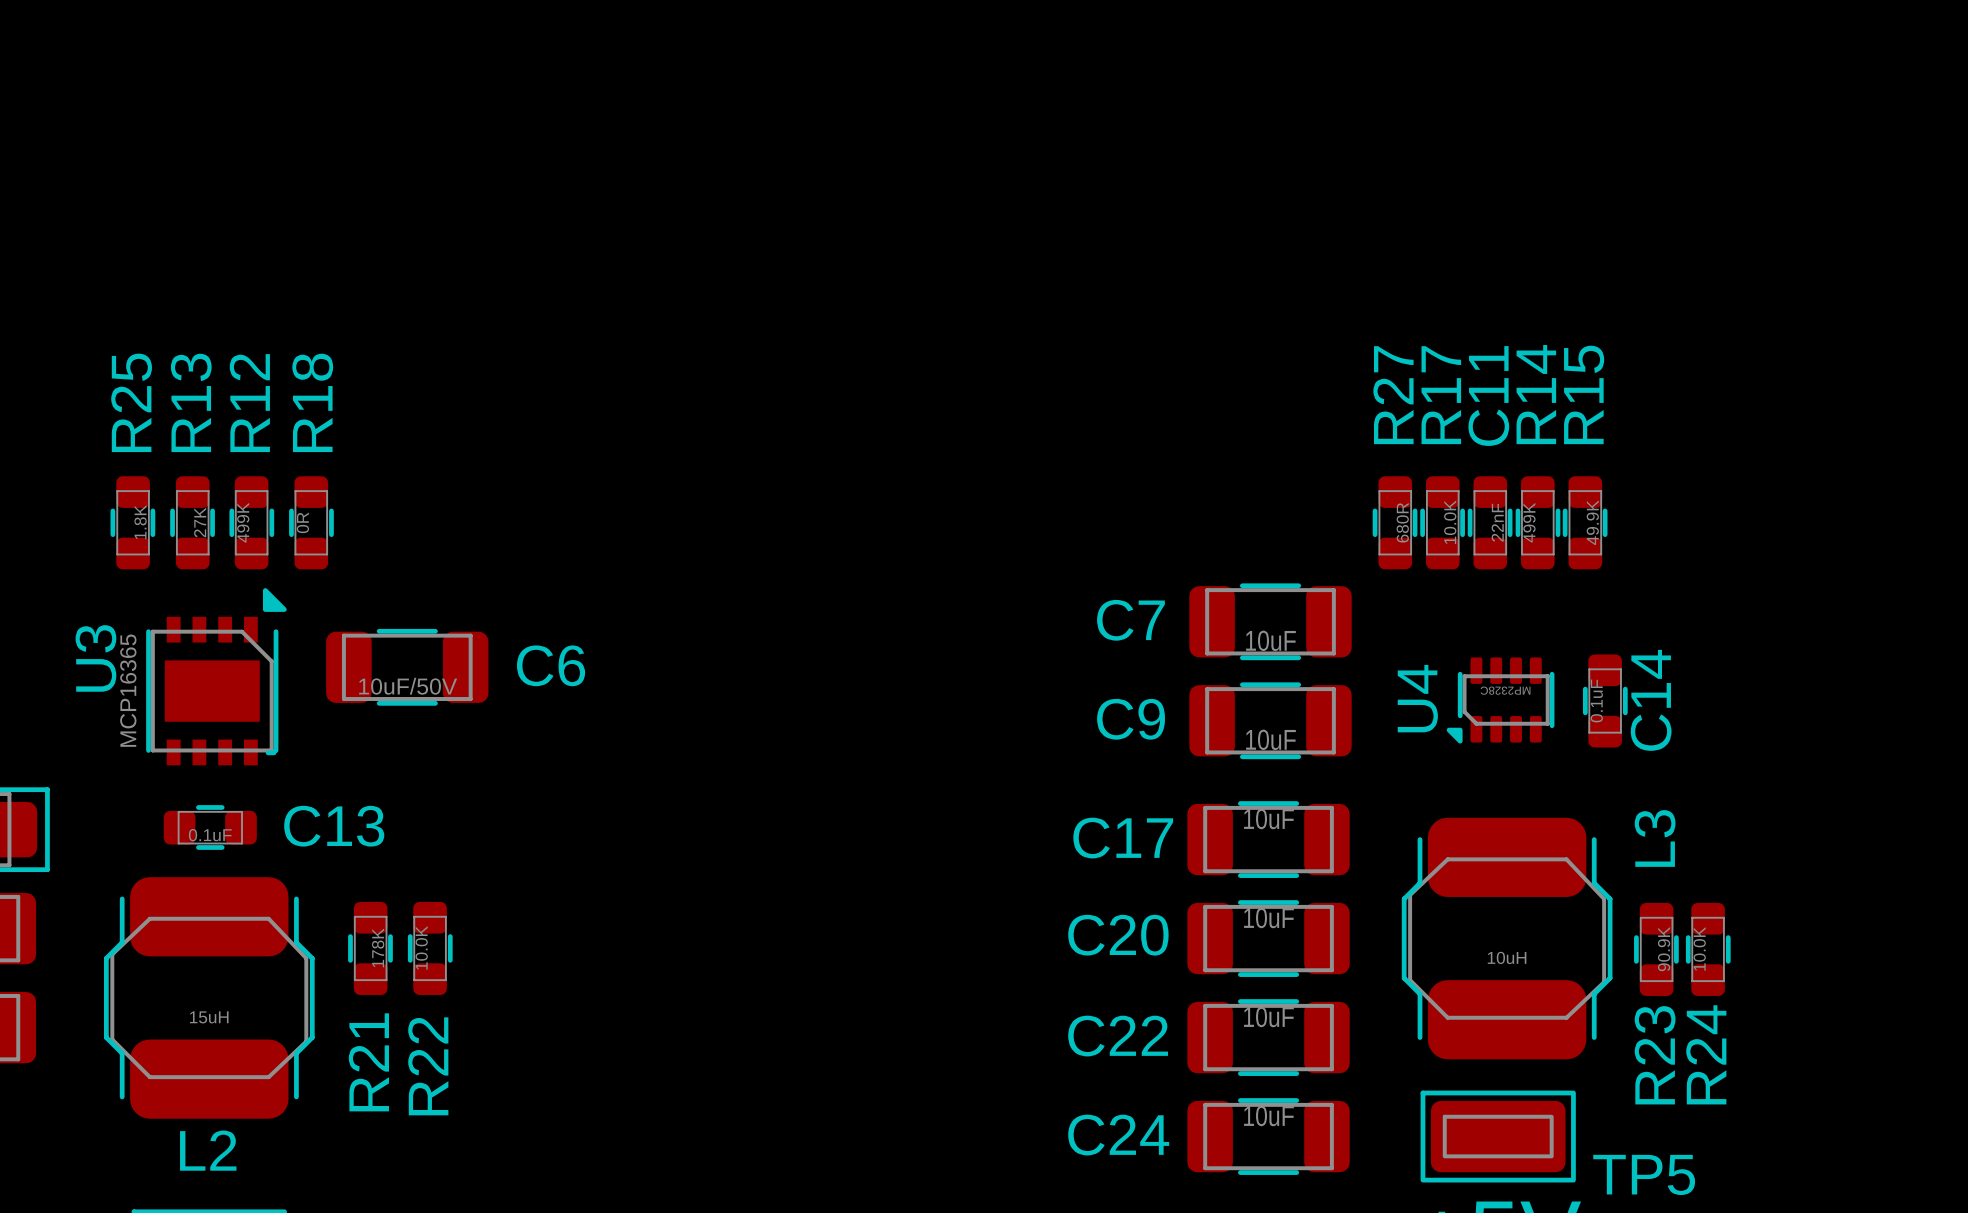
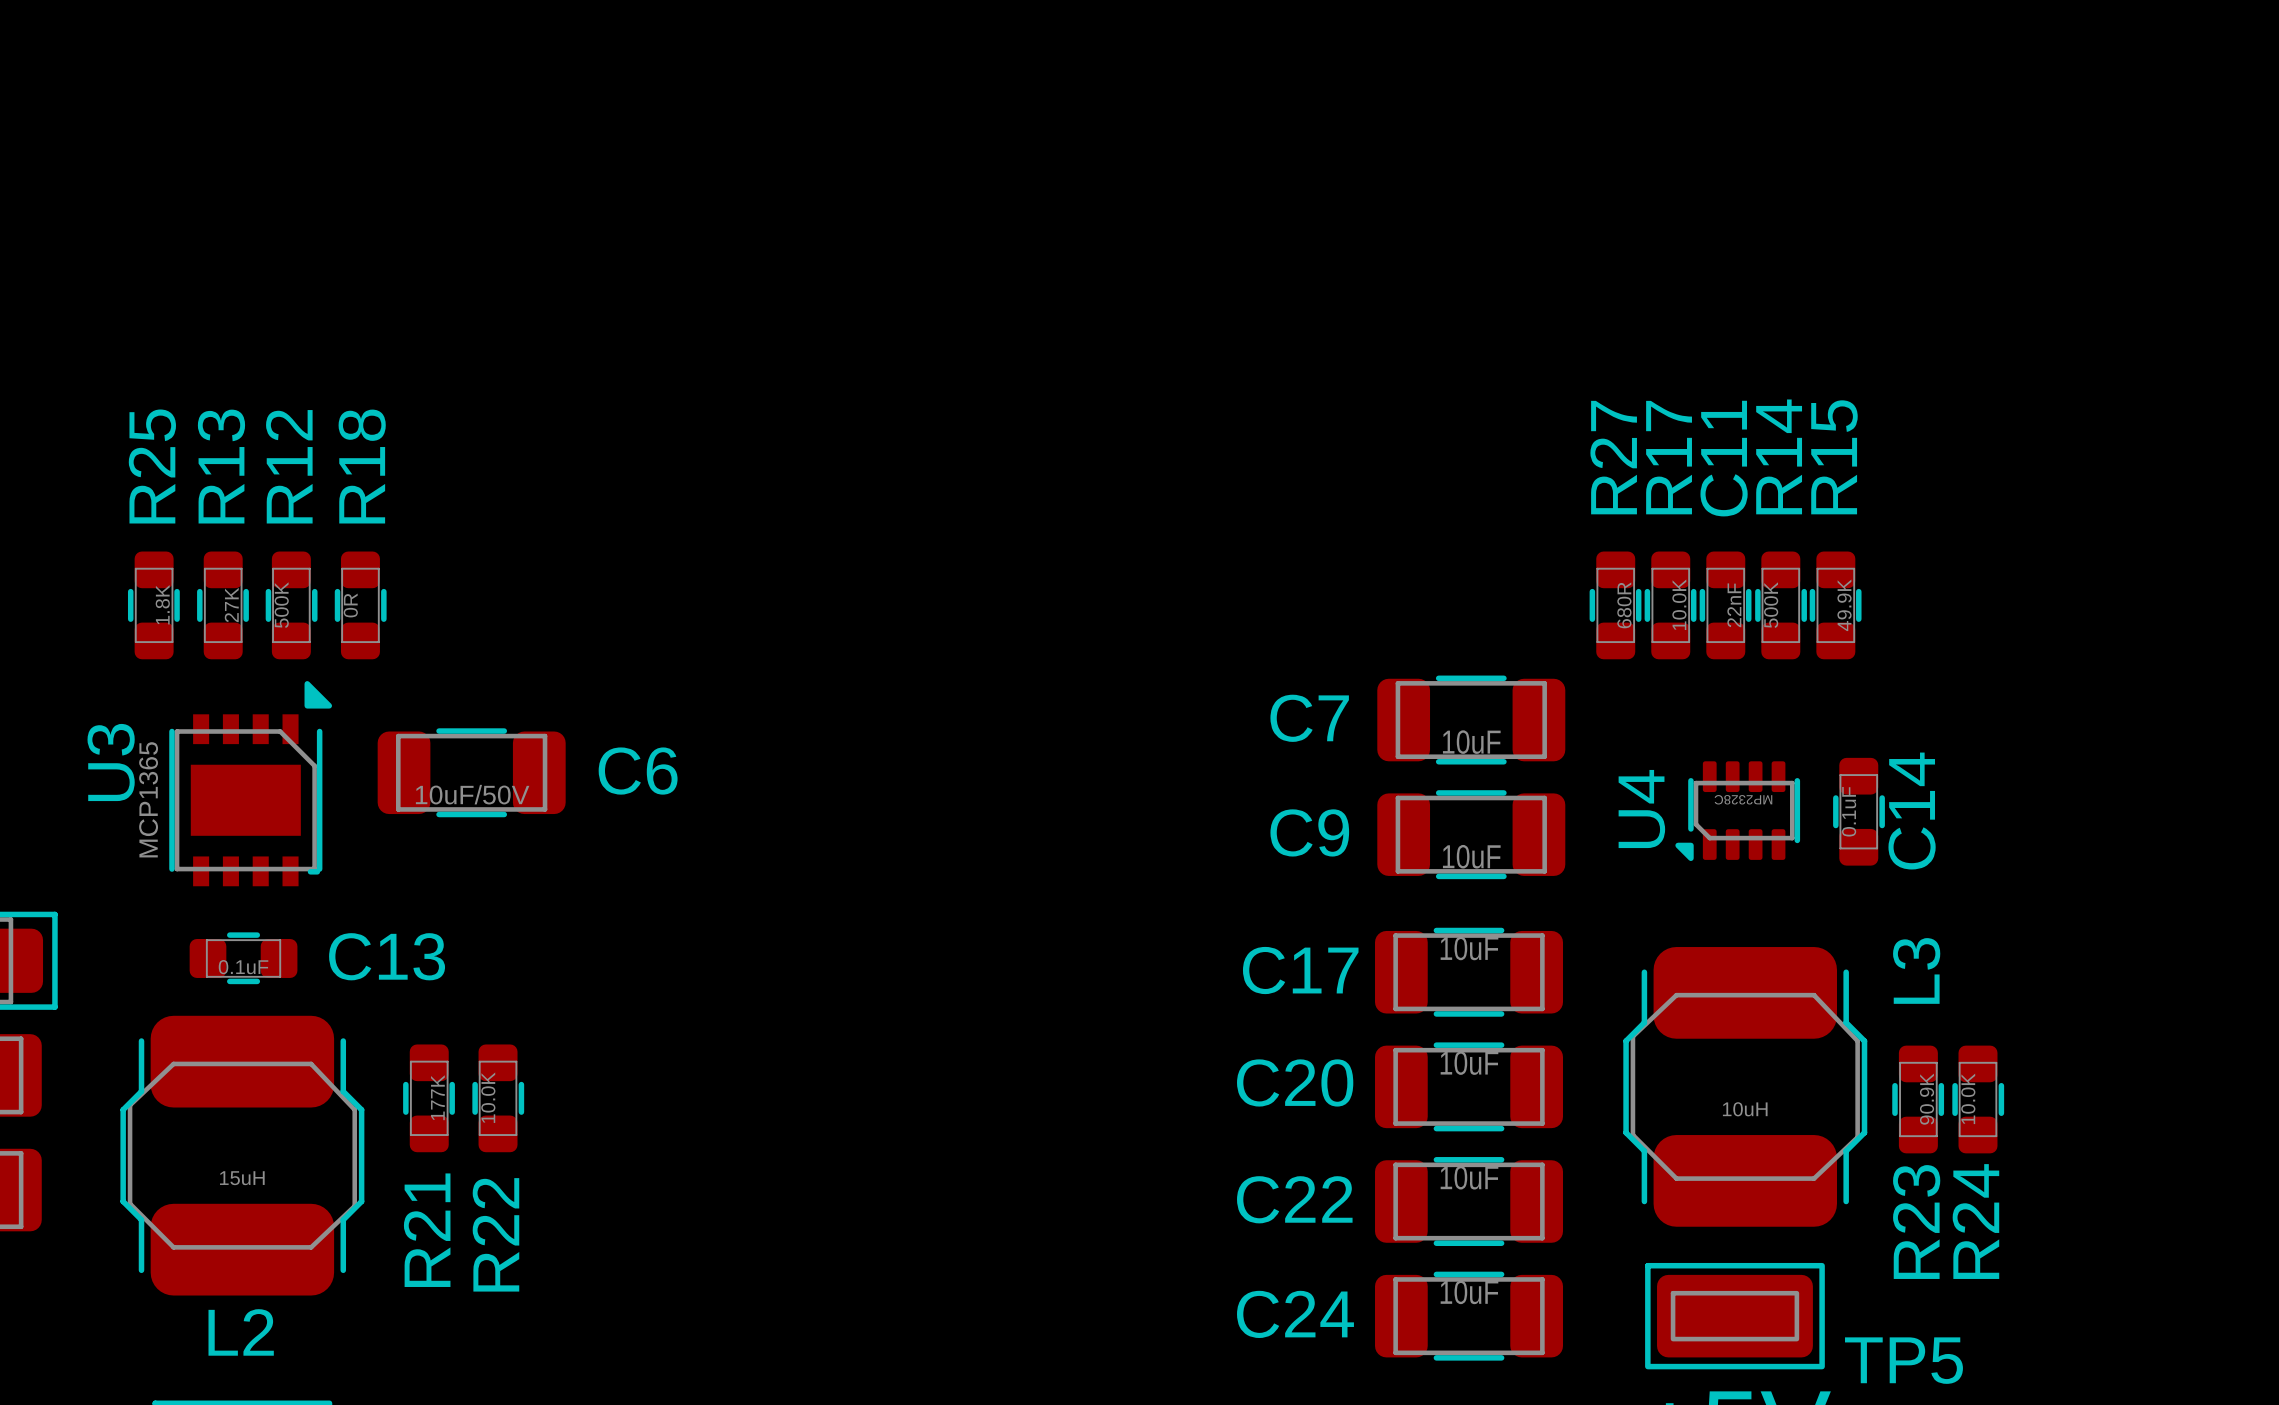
R12 value: 499K (243, 522) -> 500K (281, 605)
R14 value: 499K (1529, 522) -> 500K (1771, 605)
U3 value: MCP16365 (128, 690) -> MCP1365 (148, 799)
R21 value: 178K (378, 947) -> 177K (437, 1097)

